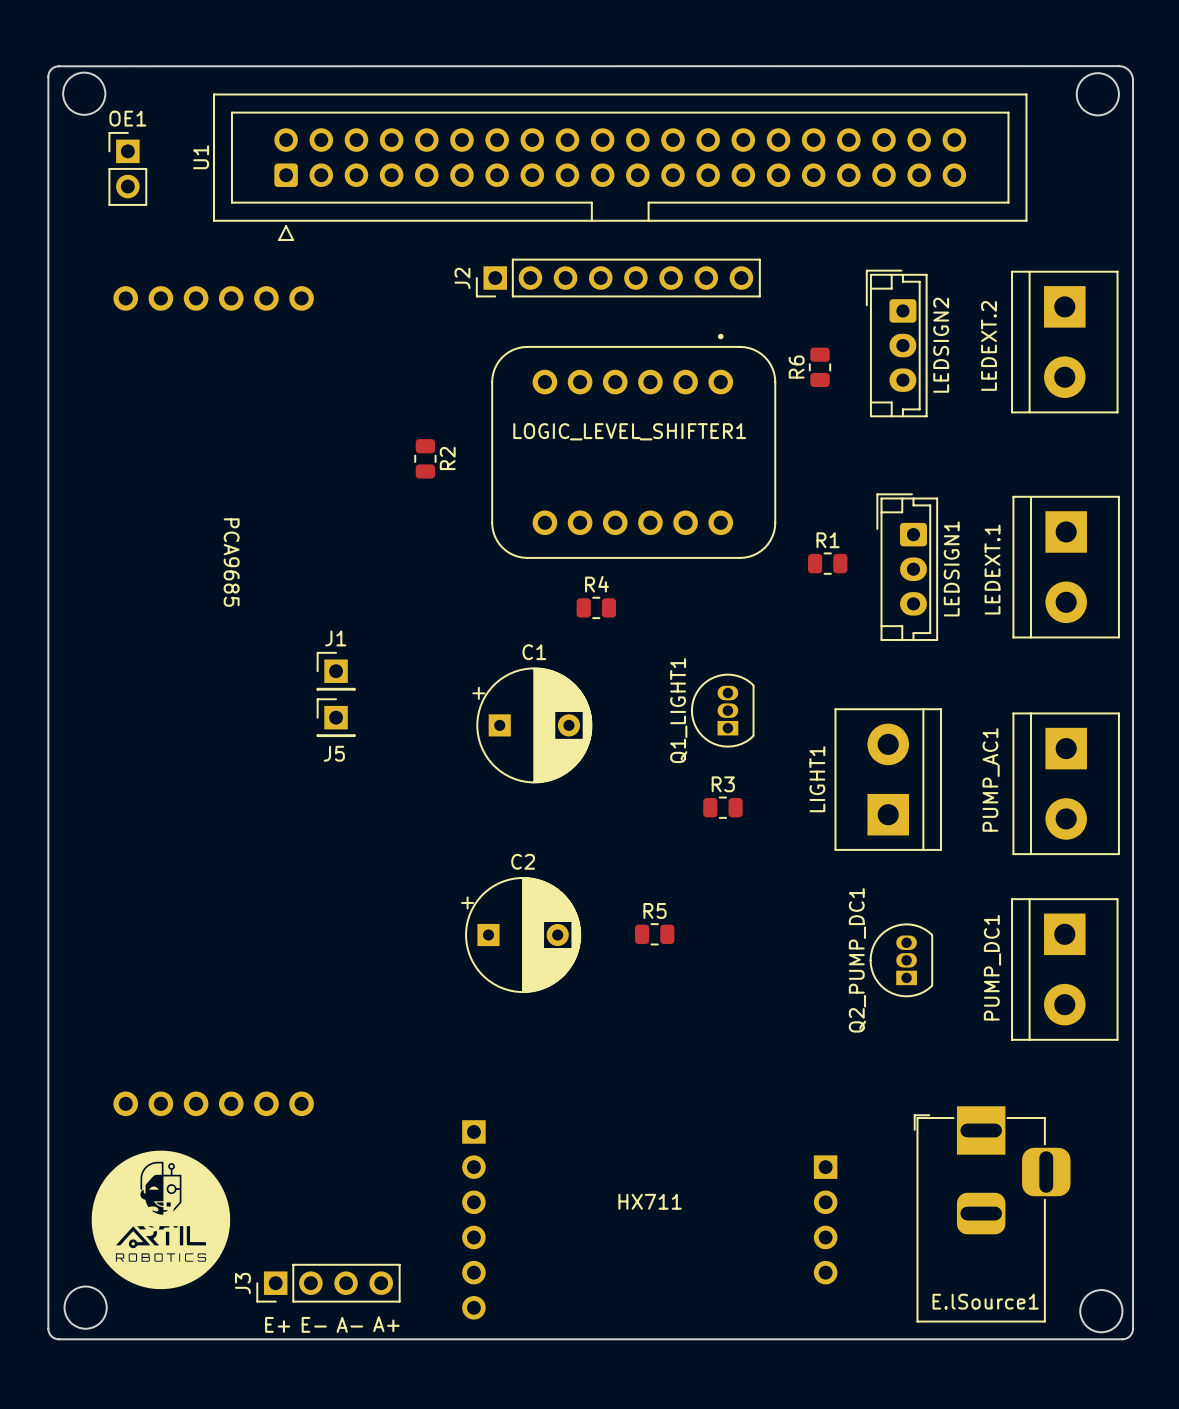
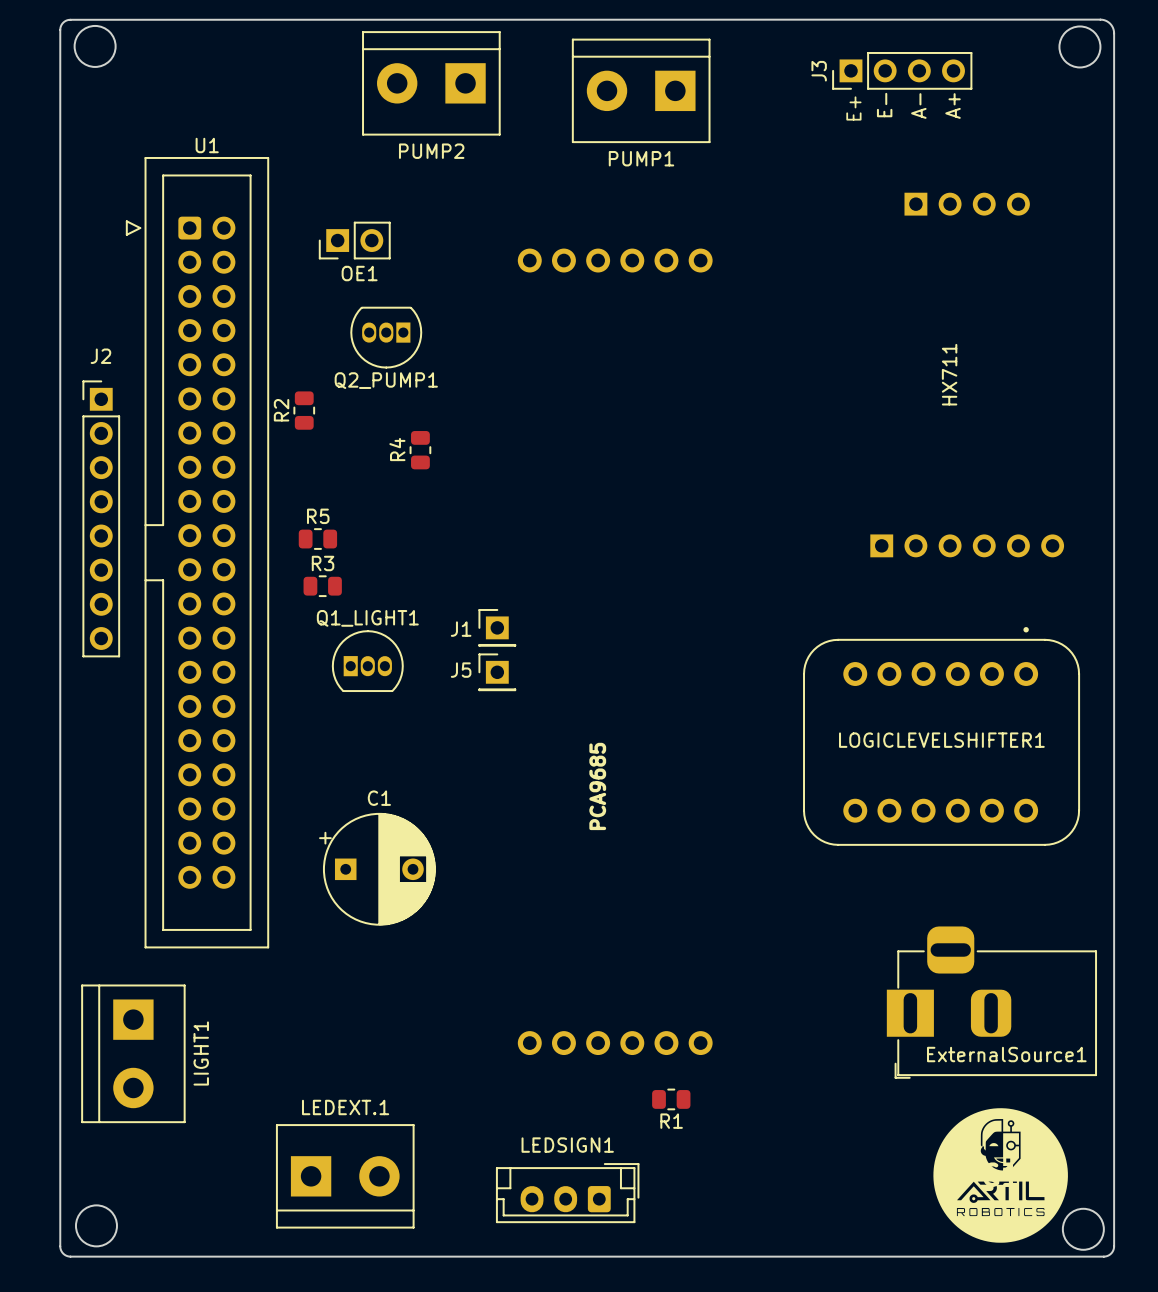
OE1 name position: OE1 (127, 118) -> OE1 (359, 273)
PUMP2: none -> (431, 83)
PUMP1: none -> (641, 90)
text: none -> E- (884, 105)
text: none -> A- (918, 106)
text: none -> A+ (953, 106)
text: none -> E+ (853, 108)
U1 rotation: 0° (620, 167) -> 90° clockwise (197, 552)
U1 position: (620, 167) -> (197, 552)
OE1 rotation: 0° (127, 168) -> 90° counterclockwise (354, 240)
OE1 position: (127, 168) -> (354, 240)
J2 rotation: 0° (618, 278) -> 90° clockwise (101, 518)
J2 position: (618, 278) -> (101, 518)
LEDEXT.2: (1064, 342) -> none
LEDSIGN2: (896, 343) -> none
R6: (820, 367) -> none
Q2_PUMP1: none -> (386, 337)
LOGIC_LEVEL_SHIFTER1: (633, 446) -> none
R2 position: (425, 458) -> (304, 410)
R2 name position: R2 (447, 458) -> R2 (281, 410)
R1 name position: R1 (828, 540) -> R1 (671, 1121)
PCA9685 name rotation: 0° (231, 562) -> 180° (597, 786)
PCA9685 name position: PCA9685 (231, 562) -> PCA9685 (597, 786)
R1 position: (827, 563) -> (671, 1099)
LEDSIGN1 rotation: 0° (907, 567) -> 90° clockwise (567, 1193)
LEDSIGN1 position: (907, 567) -> (567, 1193)
LEDEXT.1 rotation: 0° (1066, 567) -> 90° counterclockwise (345, 1176)
LEDEXT.1 position: (1066, 567) -> (345, 1176)
LEDSIGN1 name position: LEDSIGN1 (951, 568) -> LEDSIGN1 (567, 1145)
LEDEXT.1 name position: LEDEXT.1 (992, 569) -> LEDEXT.1 (345, 1107)
R4 name position: R4 (596, 584) -> R4 (397, 449)
R4 rotation: 0° (596, 607) -> 90° clockwise (420, 450)
R4 position: (596, 607) -> (420, 450)
J1 name position: J1 (335, 638) -> J1 (461, 629)
J1 position: (336, 671) -> (497, 627)
PCA9685 position: (213, 701) -> (615, 651)
Q1_LIGHT1 rotation: 0° (722, 710) -> 90° clockwise (367, 661)
Q1_LIGHT1 position: (722, 710) -> (367, 661)
J5 position: (336, 717) -> (497, 672)
C1 position: (532, 725) -> (377, 869)
J5 name position: J5 (334, 753) -> J5 (461, 670)
LIGHT1 rotation: 0° (888, 779) -> 180° (133, 1053)
LIGHT1 position: (888, 779) -> (133, 1053)
PUMP_AC1: (1066, 783) -> none
LOGICLEVELSHIFTER1: none -> (941, 736)
R3 position: (722, 807) -> (322, 586)
R5 position: (654, 934) -> (317, 539)
C2: (521, 935) -> none
Q2_PUMP_DC1: (901, 960) -> none
PUMP_DC1: (1064, 969) -> none
ExternalSource1: none -> (991, 1002)
E.lSource1: (992, 1214) -> none
part position: (160, 1219) -> (1000, 1175)
HX711 rotation: 0° (649, 1219) -> 90° counterclockwise (967, 375)
HX711 position: (649, 1219) -> (967, 375)
J3 position: (328, 1283) -> (902, 70)
text: E+ (277, 1324) -> none
text: E- (314, 1324) -> none
text: A- (349, 1324) -> none
text: A+ (386, 1324) -> none

